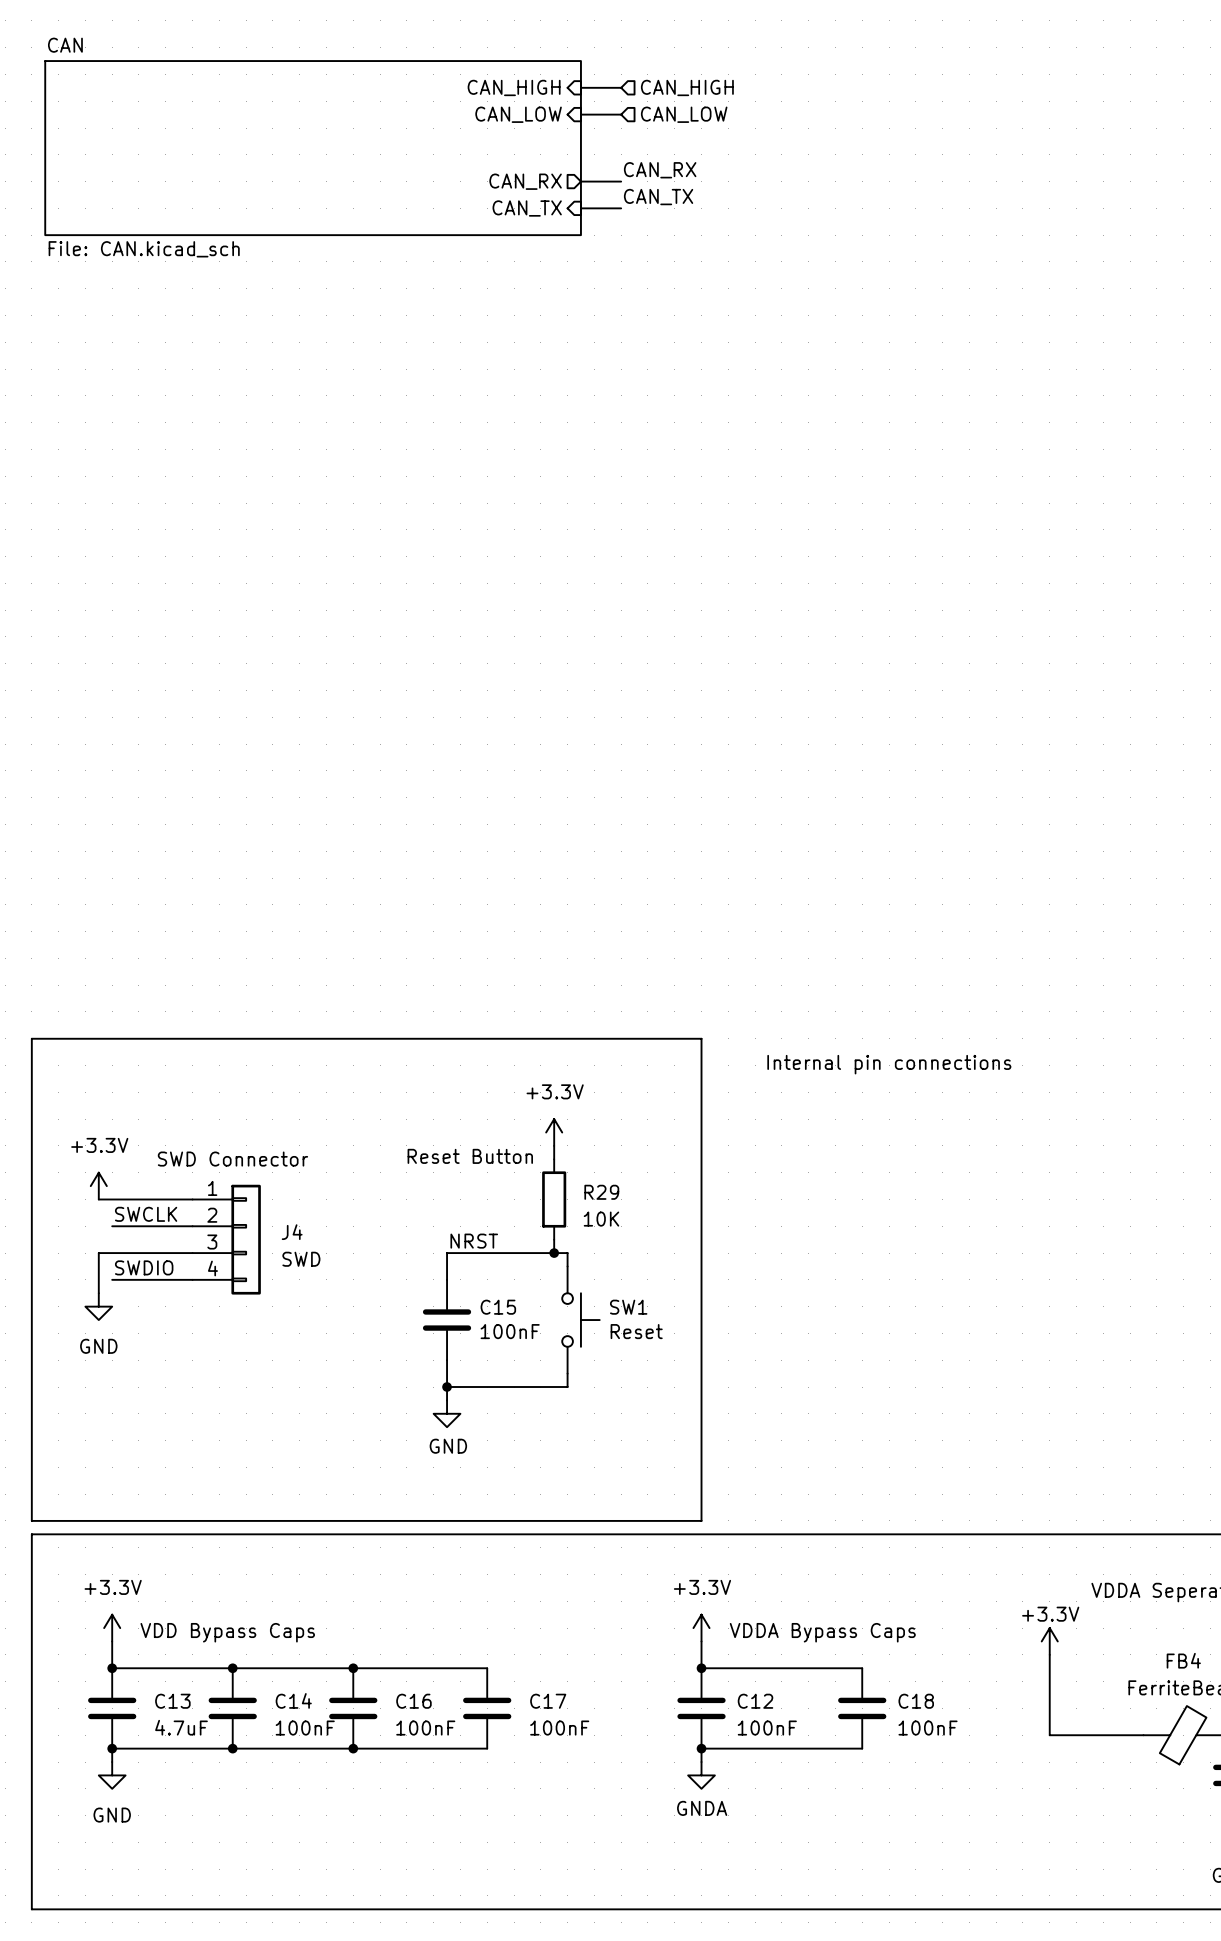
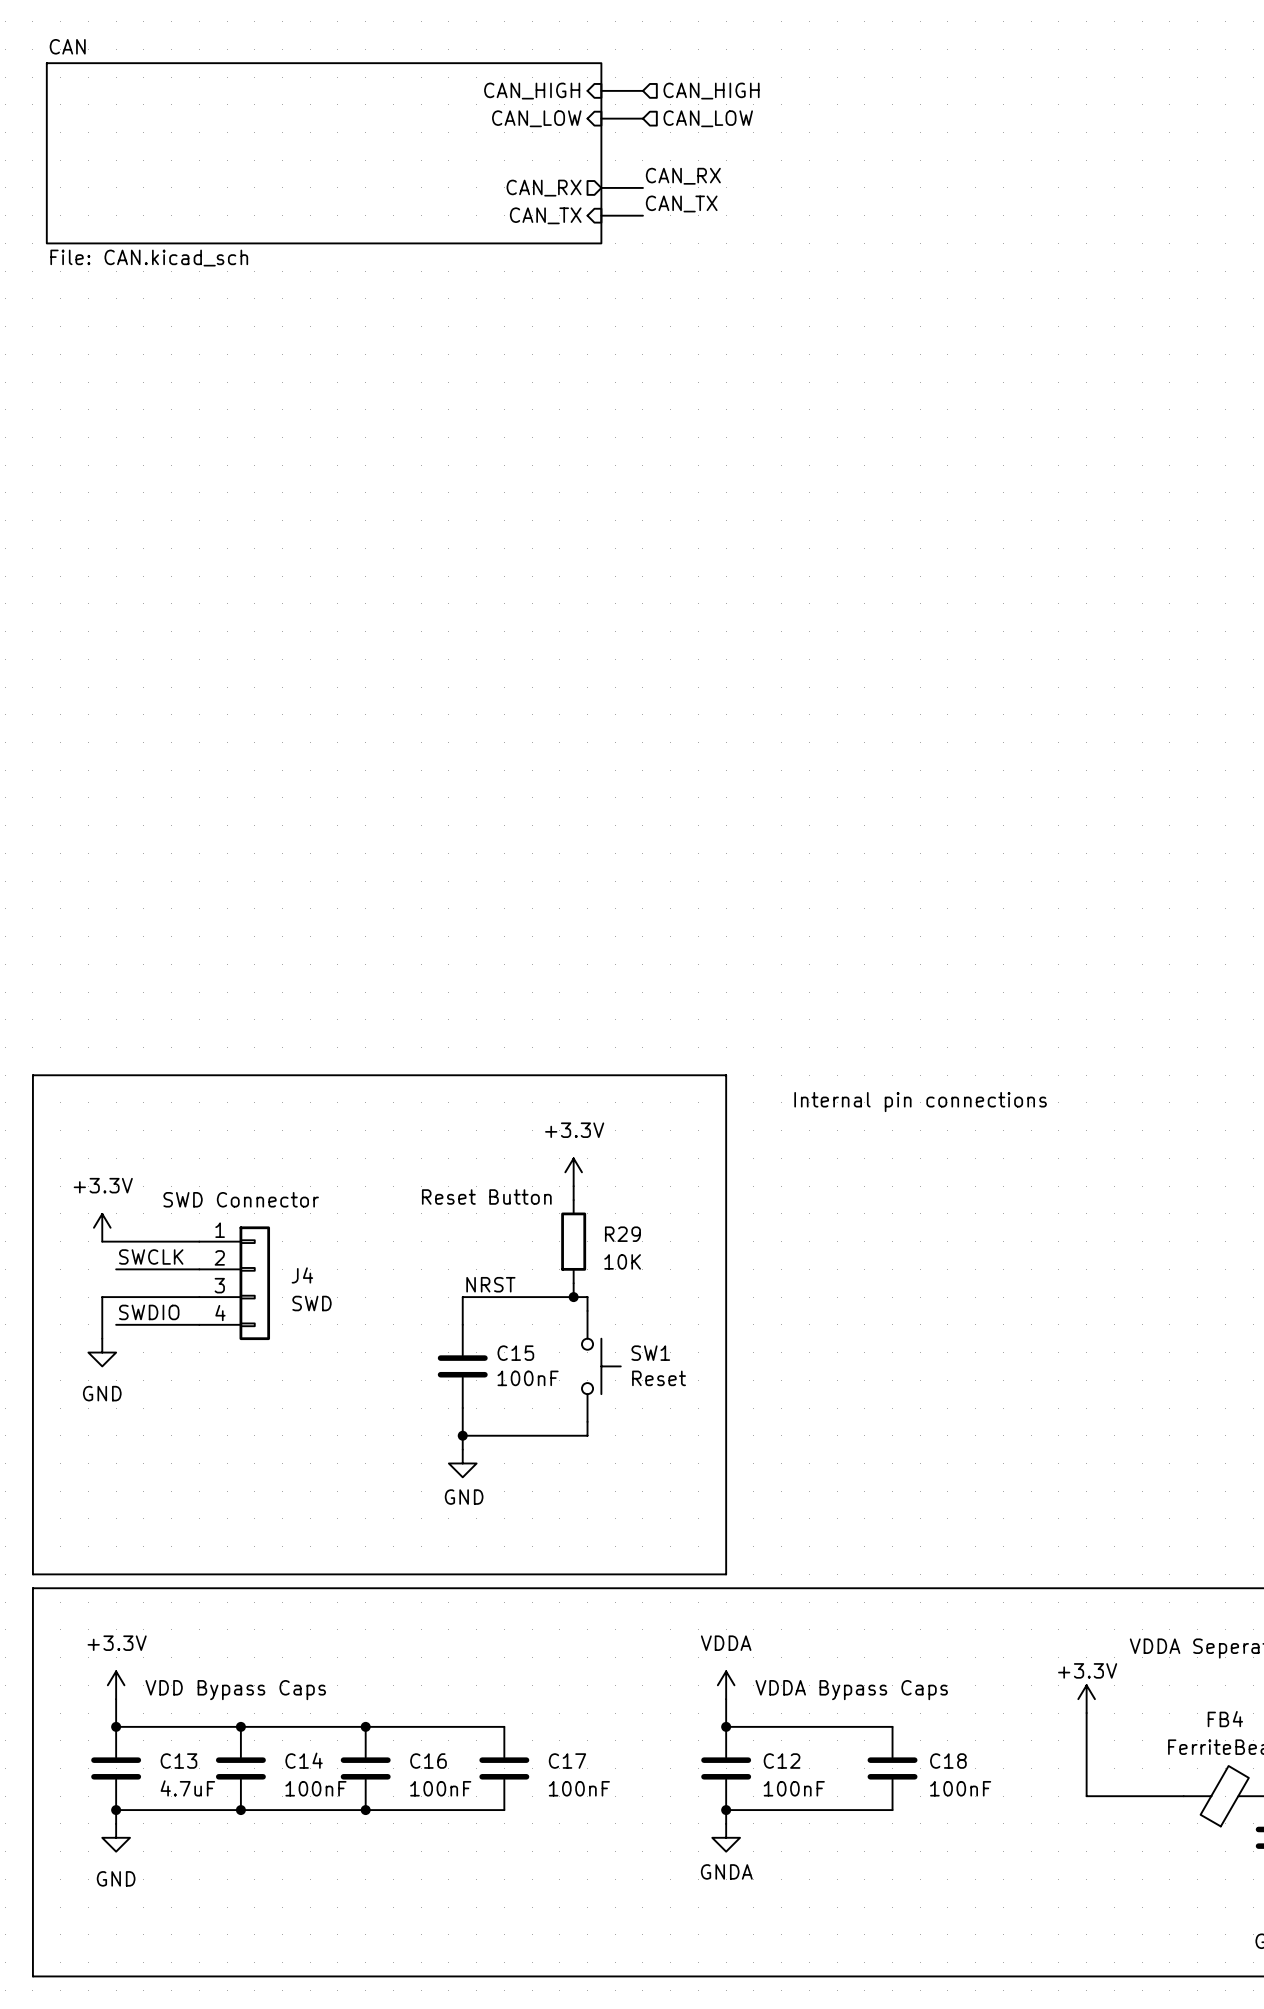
power symbol: +3.3V (701, 1628) -> VDDA (726, 1685)

